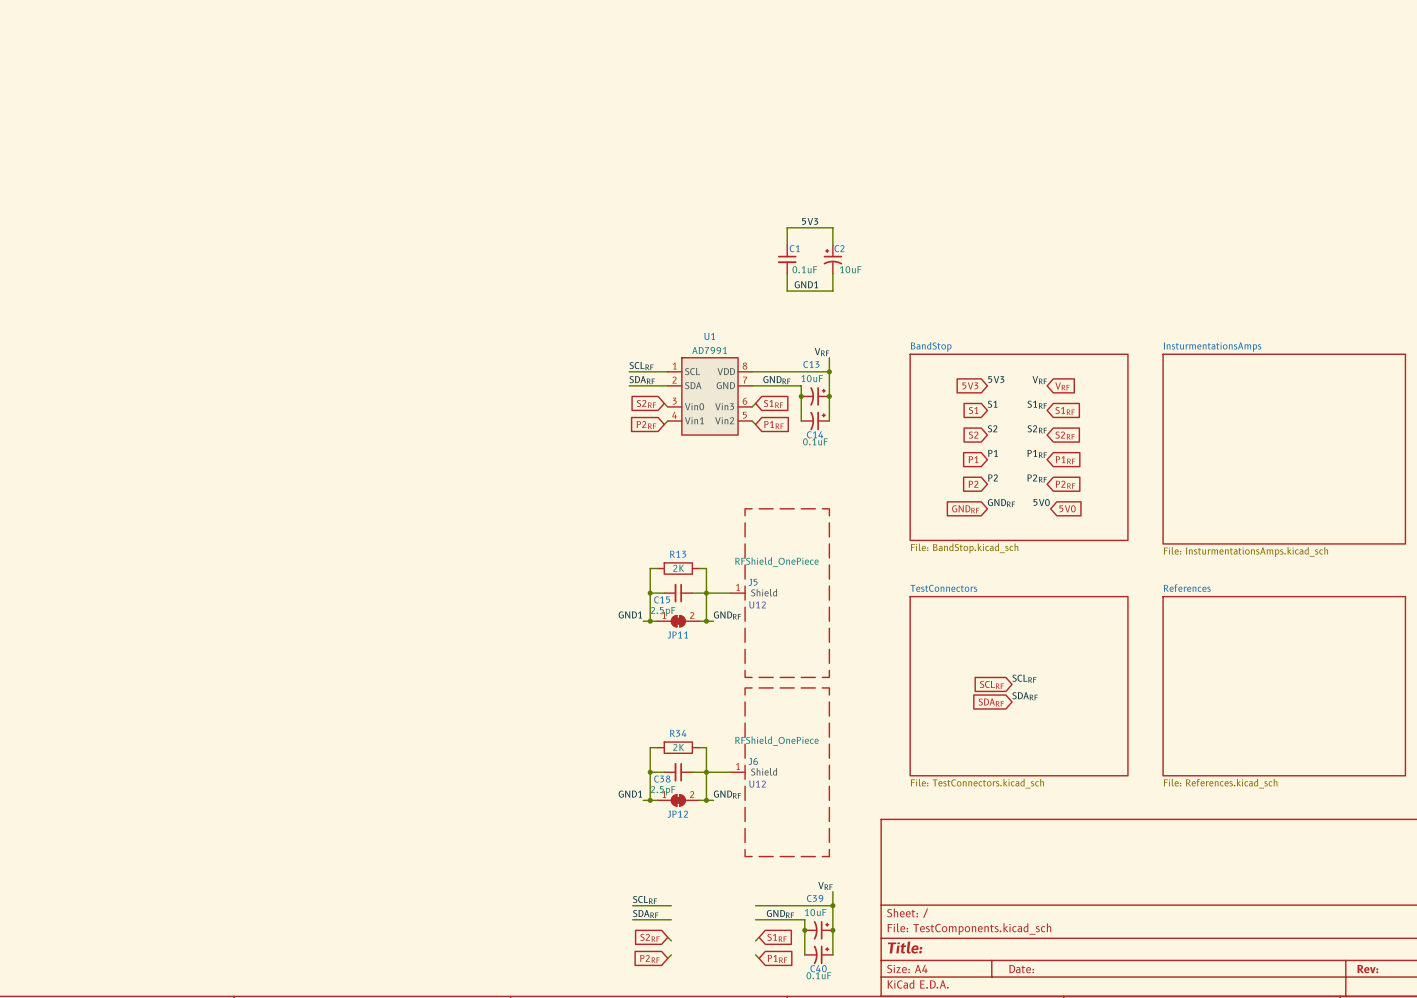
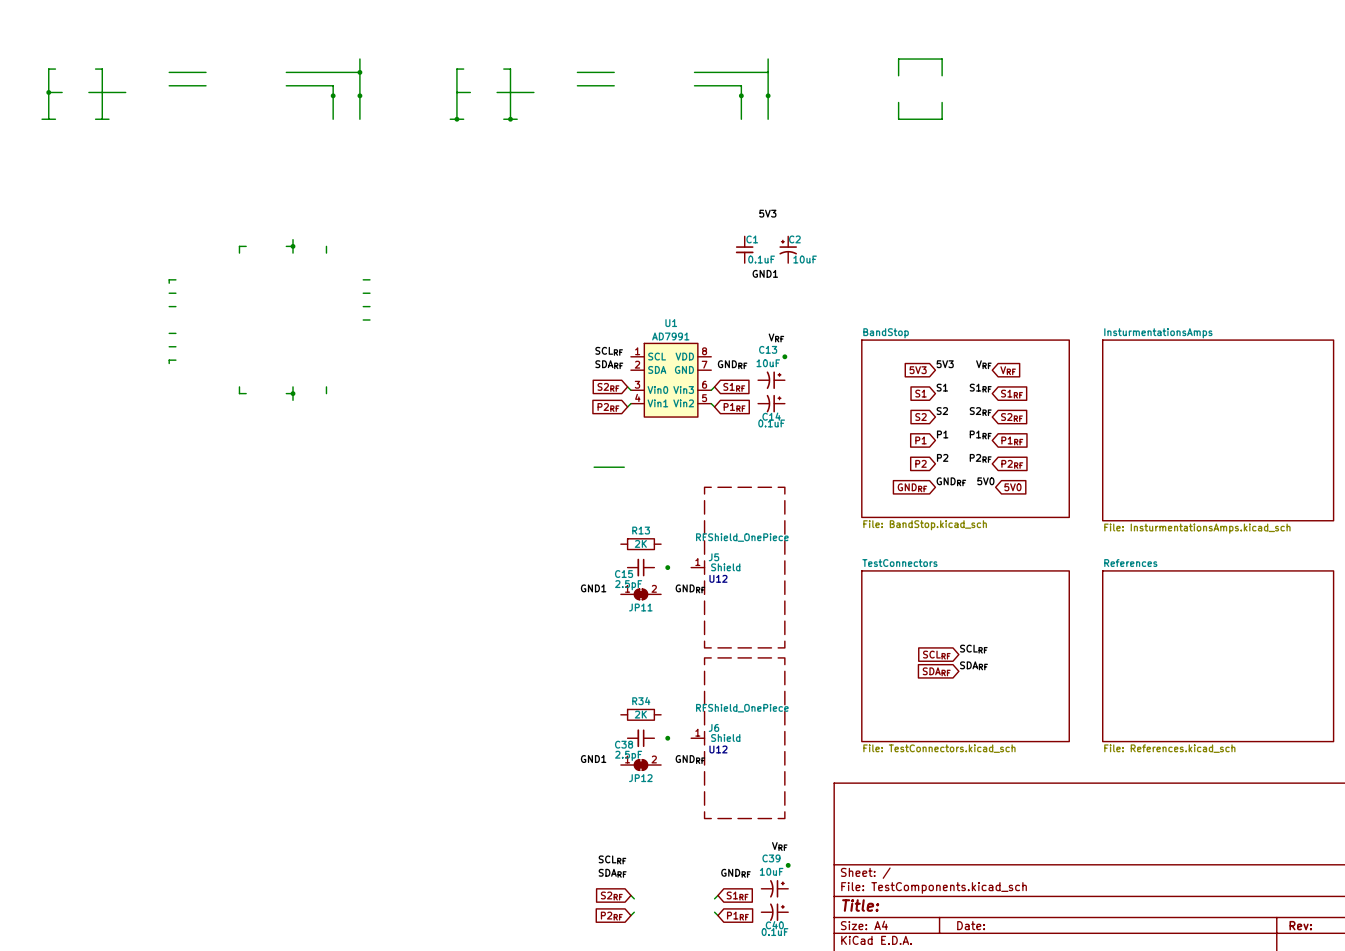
wire: none -> (359, 59) (359, 119)
wire: none -> (768, 59) (768, 119)
wire: none -> (55, 69) (48, 69) (48, 119)
wire: none -> (95, 69) (102, 69) (102, 119)
wire: none -> (463, 69) (456, 69) (456, 119)
wire: none -> (503, 69) (510, 69) (510, 119)
wire: none -> (169, 72) (206, 72)
wire: none -> (286, 72) (359, 72)
junction: none -> (359, 72)
wire: none -> (577, 72) (614, 72)
wire: none -> (694, 72) (768, 72)
wire: none -> (898, 75) (898, 59) (942, 59) (942, 75)
wire: none -> (169, 85) (206, 85)
wire: none -> (286, 85) (333, 85) (333, 119)
wire: none -> (577, 85) (614, 85)
wire: none -> (694, 85) (741, 85) (741, 119)
wire: none -> (48, 92) (62, 92)
junction: none -> (48, 92)
wire: none -> (88, 92) (125, 92)
wire: none -> (456, 92) (470, 92)
wire: none -> (497, 92) (533, 92)
junction: none -> (333, 95)
junction: none -> (359, 95)
junction: none -> (741, 95)
junction: none -> (768, 95)
wire: none -> (898, 102) (898, 119) (942, 119) (942, 102)
wire: none -> (42, 119) (55, 119)
wire: none -> (95, 119) (108, 119)
wire: none -> (450, 119) (463, 119)
junction: none -> (456, 119)
wire: none -> (503, 119) (517, 119)
junction: none -> (510, 119)
wire: (787, 245) (787, 227) (832, 227) (832, 245) -> none
wire: none -> (293, 239) (293, 253)
wire: none -> (246, 246) (239, 246) (239, 253)
wire: none -> (286, 246) (293, 246)
junction: none -> (293, 246)
wire: none -> (326, 246) (326, 253)
wire: (787, 273) (787, 291) (832, 291) (832, 273) -> none
wire: none -> (175, 279) (169, 279) (169, 283)
wire: none -> (363, 279) (369, 279)
wire: none -> (169, 293) (175, 293)
wire: none -> (363, 293) (369, 293)
wire: none -> (169, 306) (175, 306)
wire: none -> (363, 306) (369, 306)
wire: none -> (363, 319) (369, 319)
wire: none -> (169, 333) (175, 333)
wire: (829, 357) (829, 420) -> none
wire: none -> (169, 346) (175, 346)
wire: (629, 371) (667, 371) -> none
wire: (752, 371) (829, 371) -> none
wire: none -> (175, 360) (169, 360) (169, 363)
wire: (629, 385) (667, 385) -> none
wire: (752, 385) (801, 385) (801, 420) -> none
junction: (801, 396) -> none
junction: (829, 396) -> none
wire: none -> (239, 386) (239, 393) (246, 393)
wire: none -> (293, 386) (293, 400)
wire: none -> (326, 386) (326, 393)
wire: none -> (286, 393) (293, 393)
junction: none -> (293, 393)
wire: none -> (594, 467) (624, 467)
wire: (657, 568) (650, 568) (650, 621) -> none
wire: (699, 568) (706, 568) (706, 621) -> none
wire: (650, 593) (664, 593) -> none
junction: (650, 593) -> none
wire: (692, 593) (731, 593) -> none
wire: (643, 621) (657, 621) -> none
junction: (650, 621) -> none
wire: (699, 621) (713, 621) -> none
junction: (706, 621) -> none
wire: (657, 747) (650, 747) (650, 800) -> none
wire: (699, 747) (706, 747) (706, 800) -> none
wire: (650, 772) (664, 772) -> none
junction: (650, 772) -> none
wire: (692, 772) (731, 772) -> none
wire: (643, 800) (657, 800) -> none
junction: (650, 800) -> none
wire: (699, 800) (713, 800) -> none
junction: (706, 800) -> none
wire: (832, 891) (832, 954) -> none
wire: (632, 905) (671, 905) -> none
wire: (755, 905) (832, 905) -> none
wire: (632, 919) (671, 919) -> none
wire: (755, 919) (804, 919) (804, 954) -> none
junction: (804, 930) -> none
junction: (832, 930) -> none

